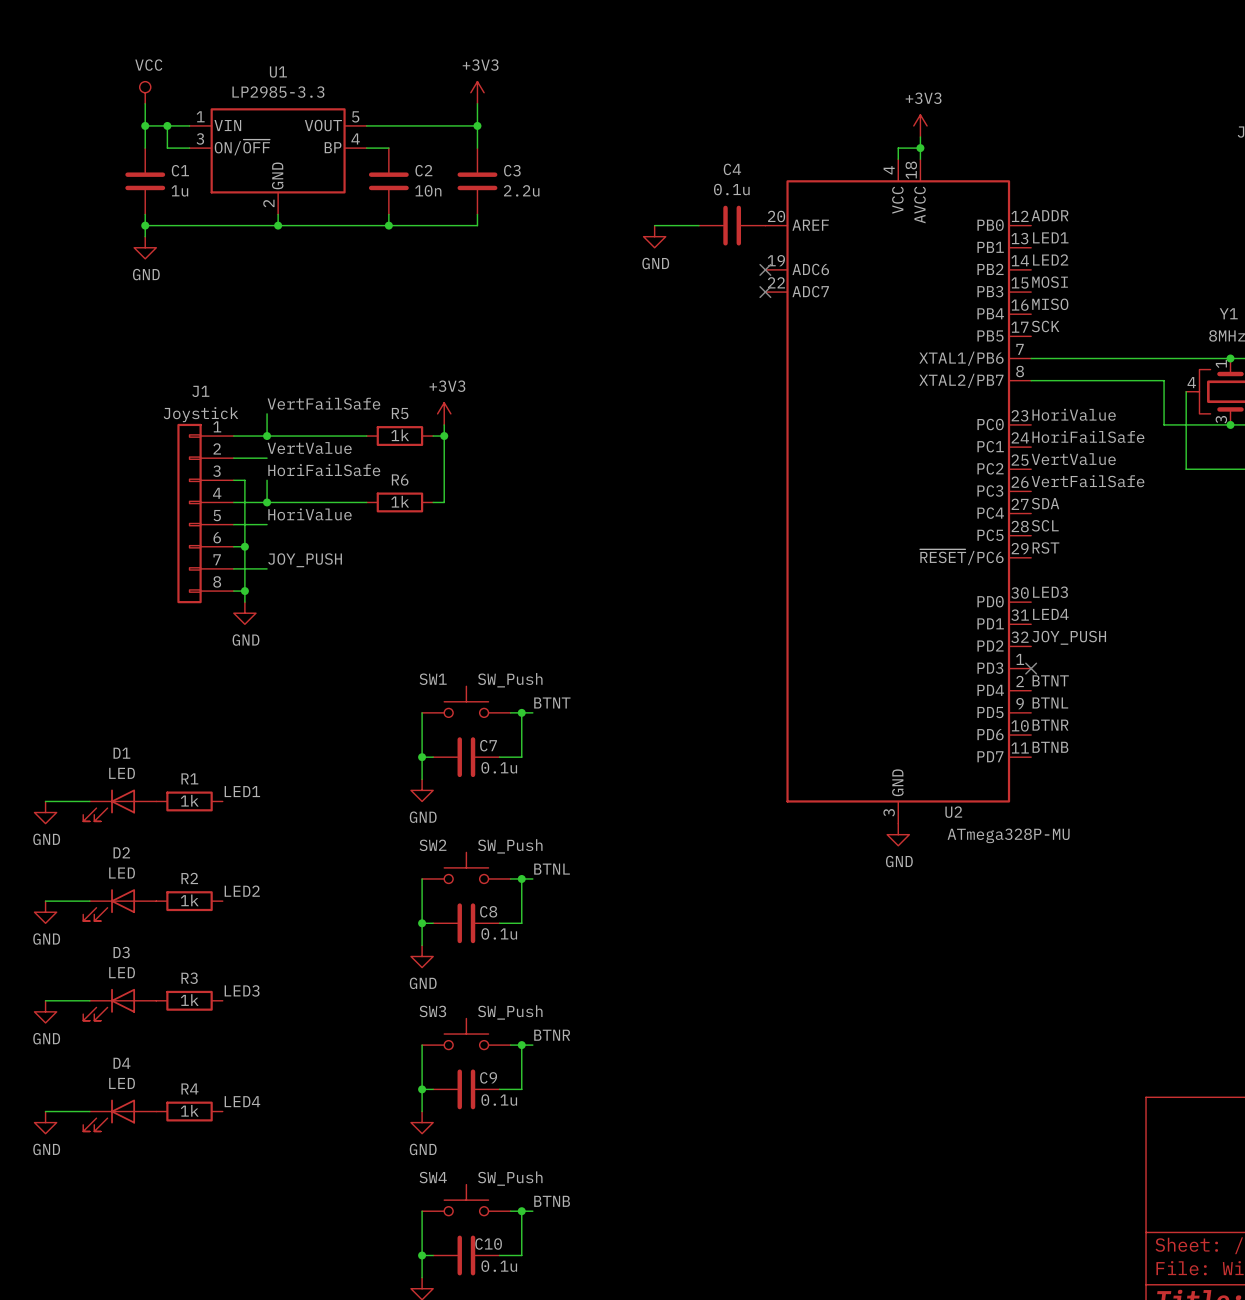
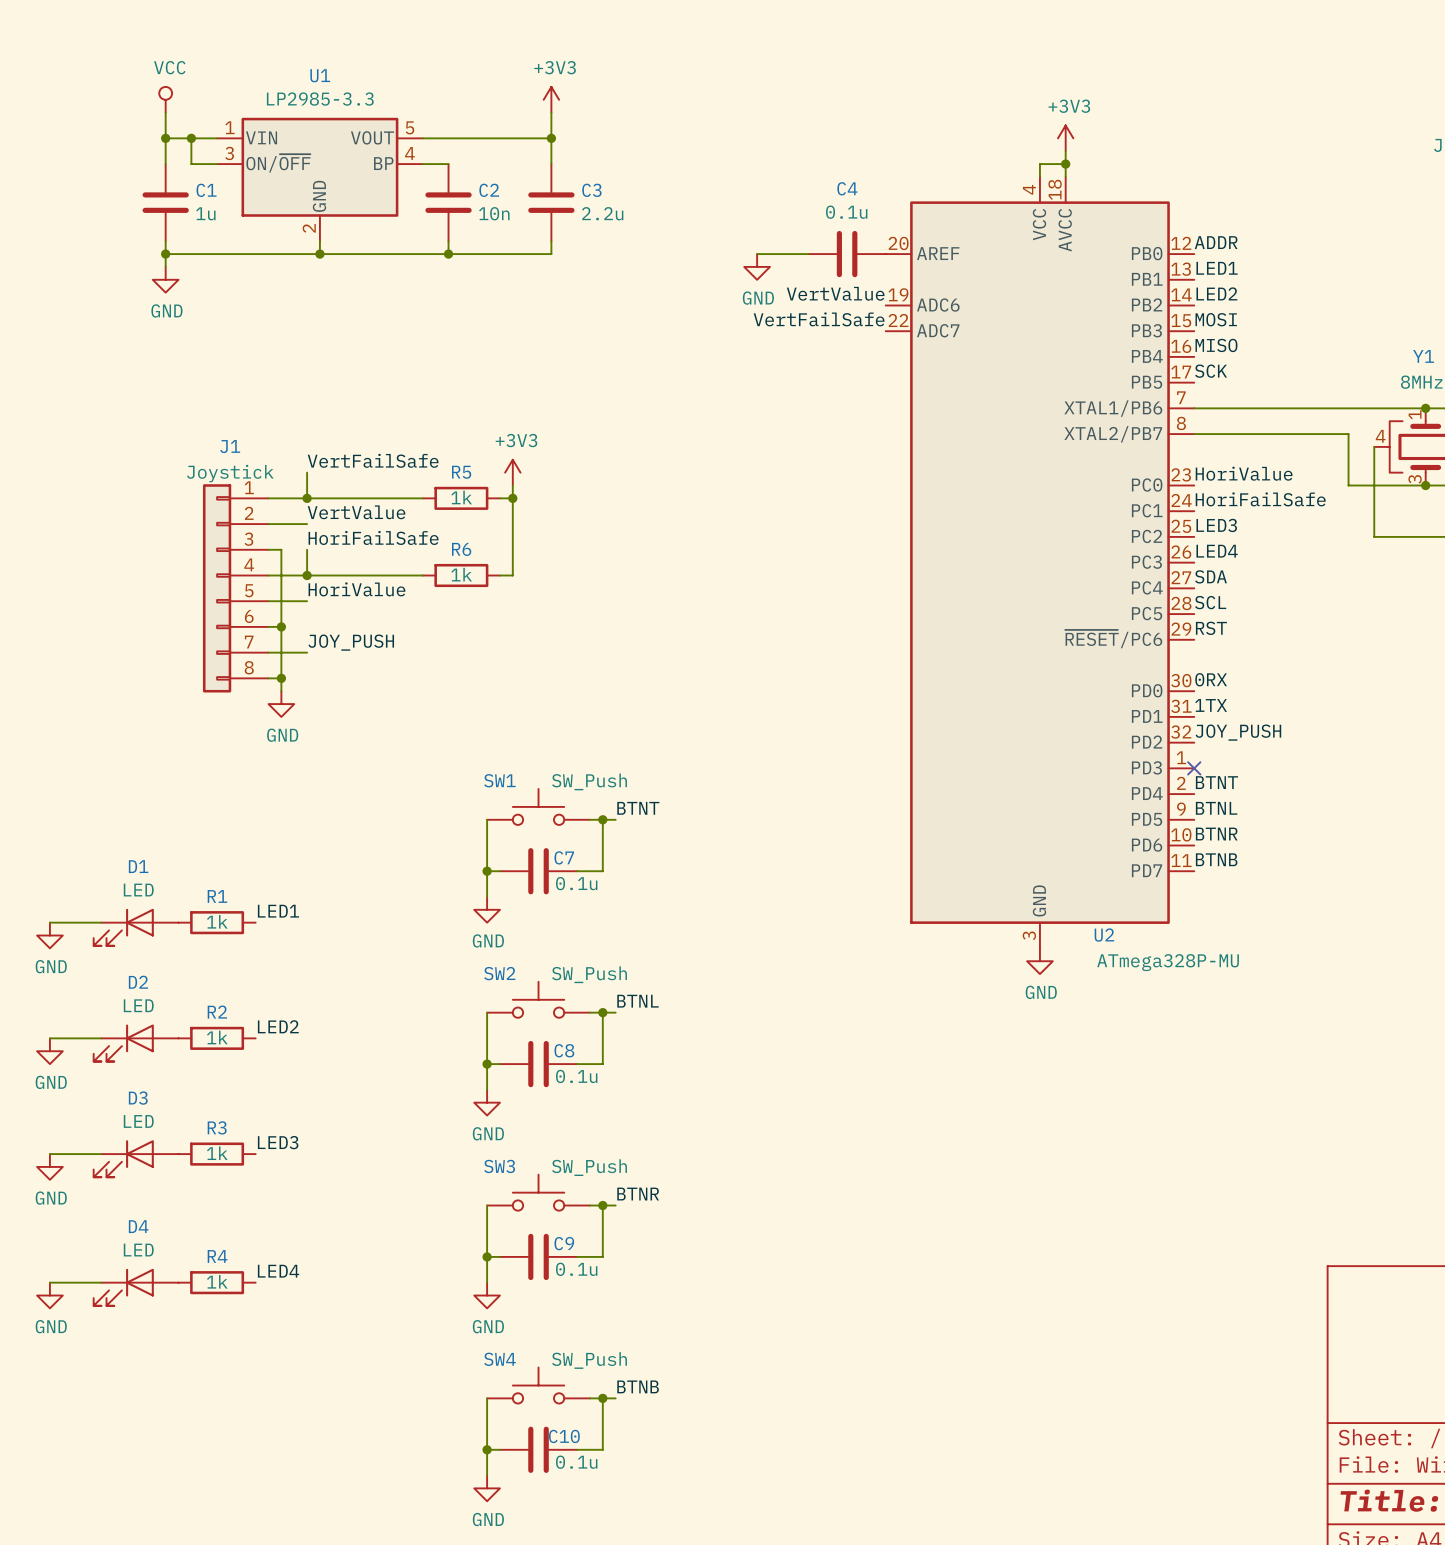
label: none -> VertValue (835, 293)
no-connect mark: (765, 269) -> none
label: none -> VertFailSafe (819, 319)
no-connect mark: (765, 292) -> none
label: VertValue (1073, 459) -> LED3 (1216, 525)
label: VertFailSafe (1088, 481) -> LED4 (1217, 551)
label: LED3 (1050, 592) -> 0RX (1211, 679)
label: LED4 (1050, 614) -> 1TX (1211, 705)

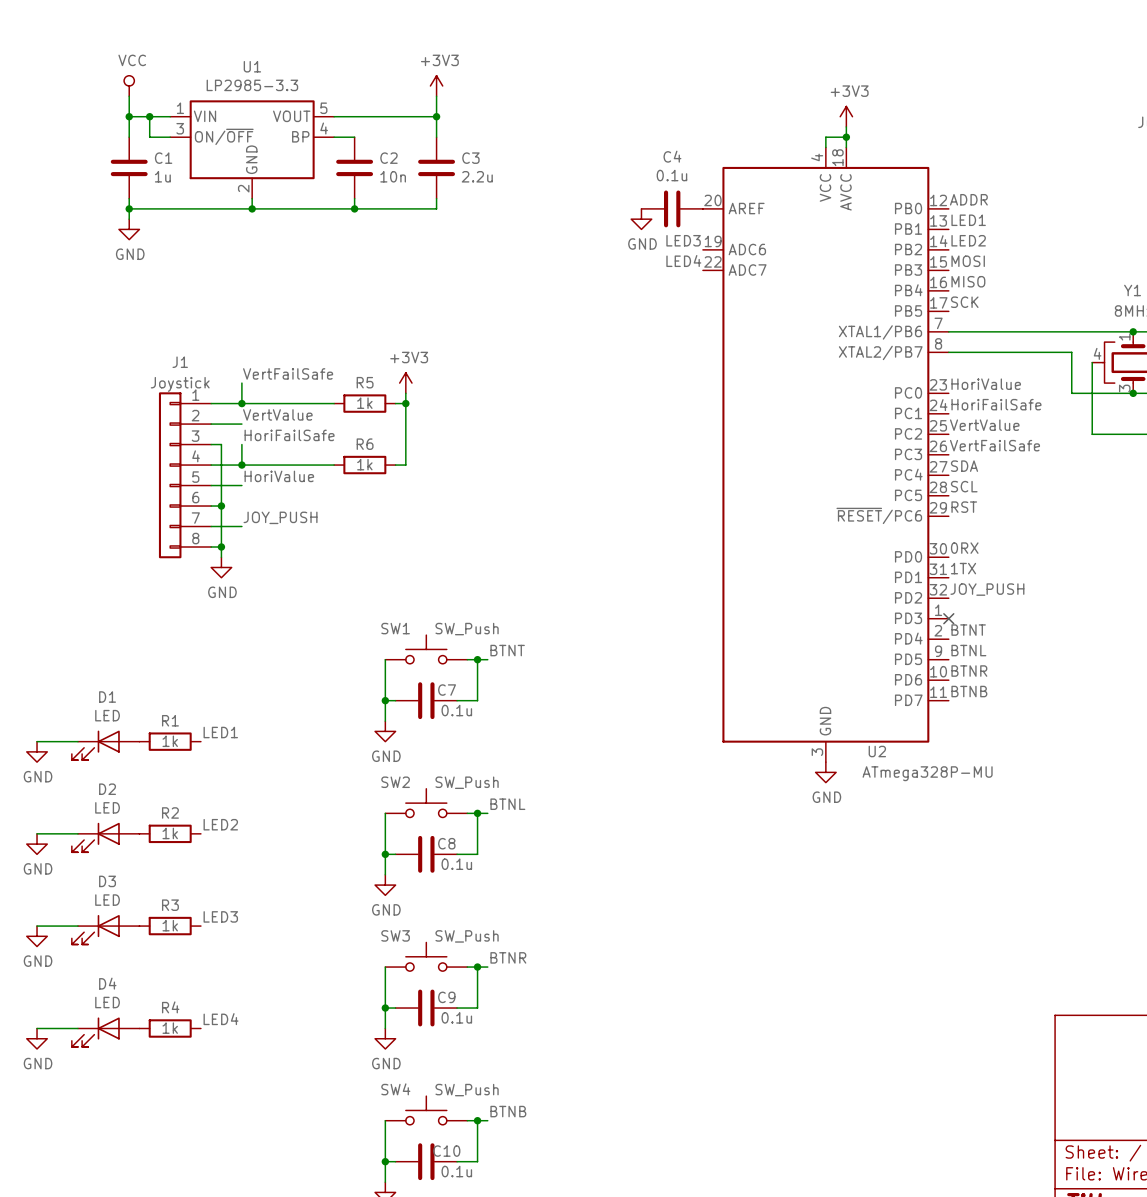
wire: (757, 254) (808, 254) -> none
power symbol position: GND (757, 266) -> GND (641, 219)
label: VertValue (835, 293) -> LED3 (683, 240)
label: VertFailSafe (819, 319) -> LED4 (683, 261)
label: LED3 (1216, 525) -> VertValue (984, 425)
label: LED4 (1217, 551) -> VertFailSafe (994, 445)

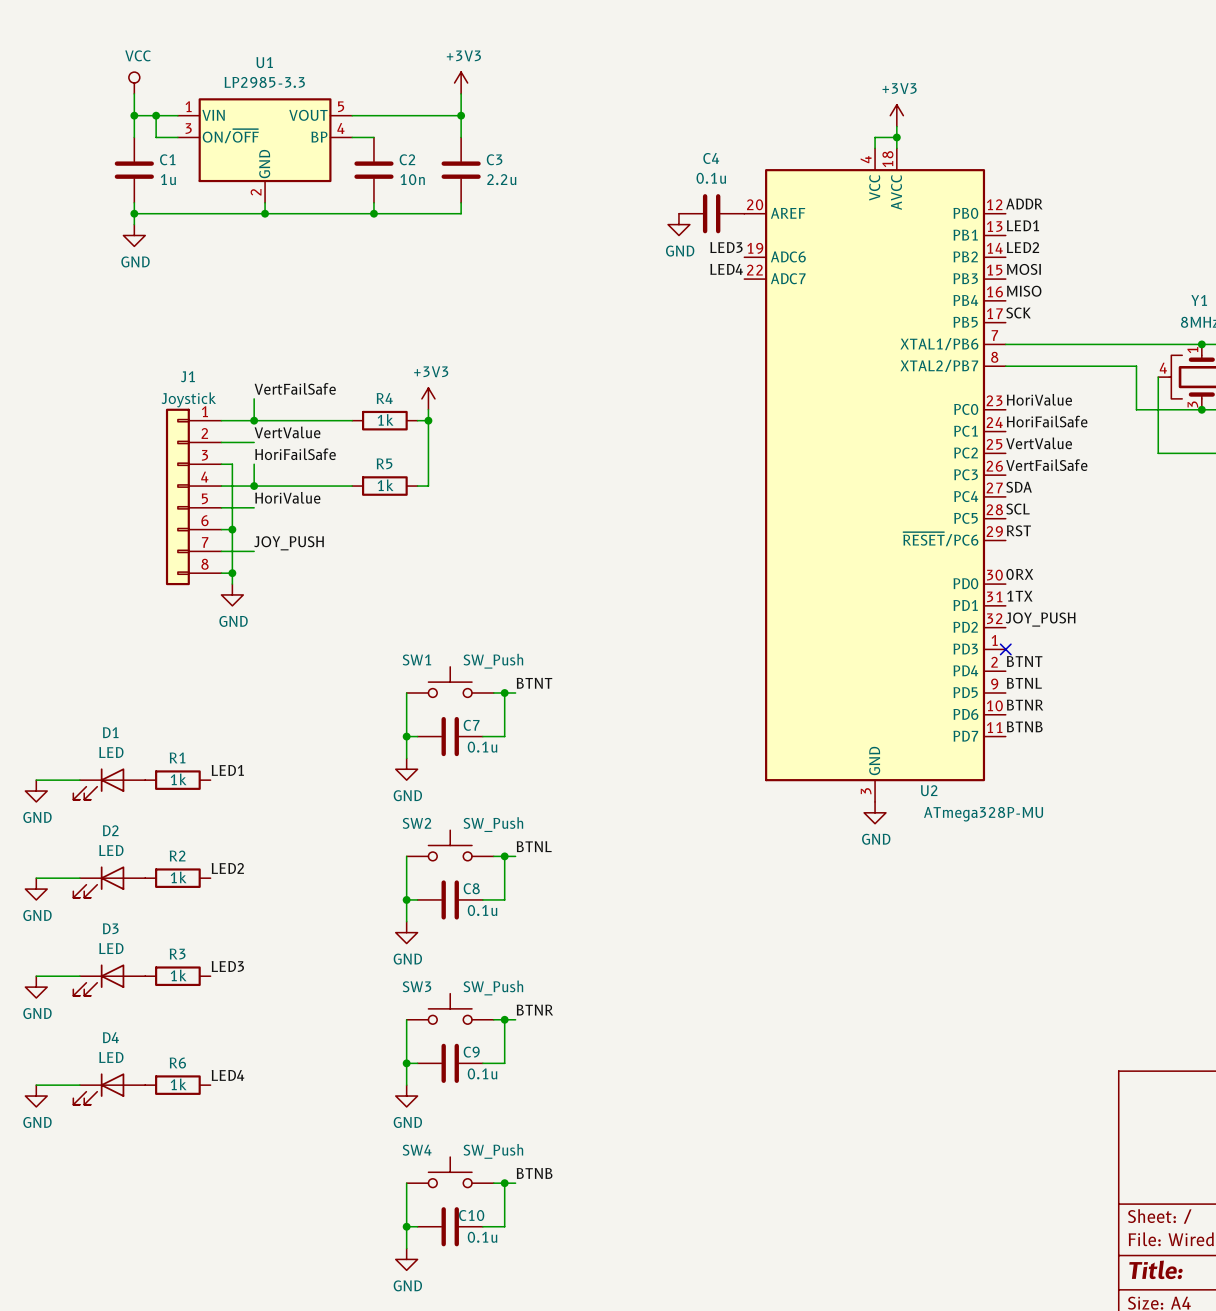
R5 name: R5 (365, 382) -> R4 (384, 398)
R6 name: R6 (365, 444) -> R5 (384, 463)
R4 name: R4 (170, 1007) -> R6 (177, 1063)

